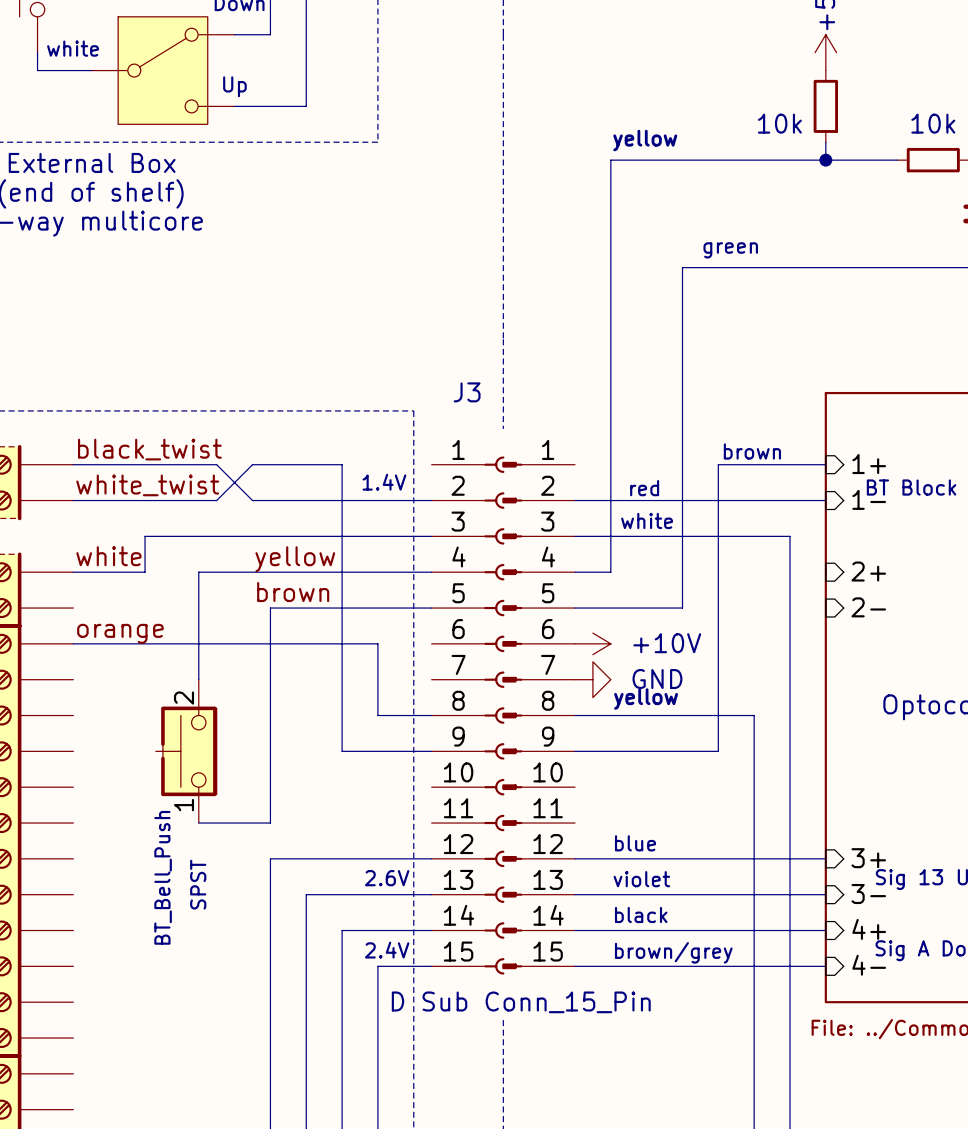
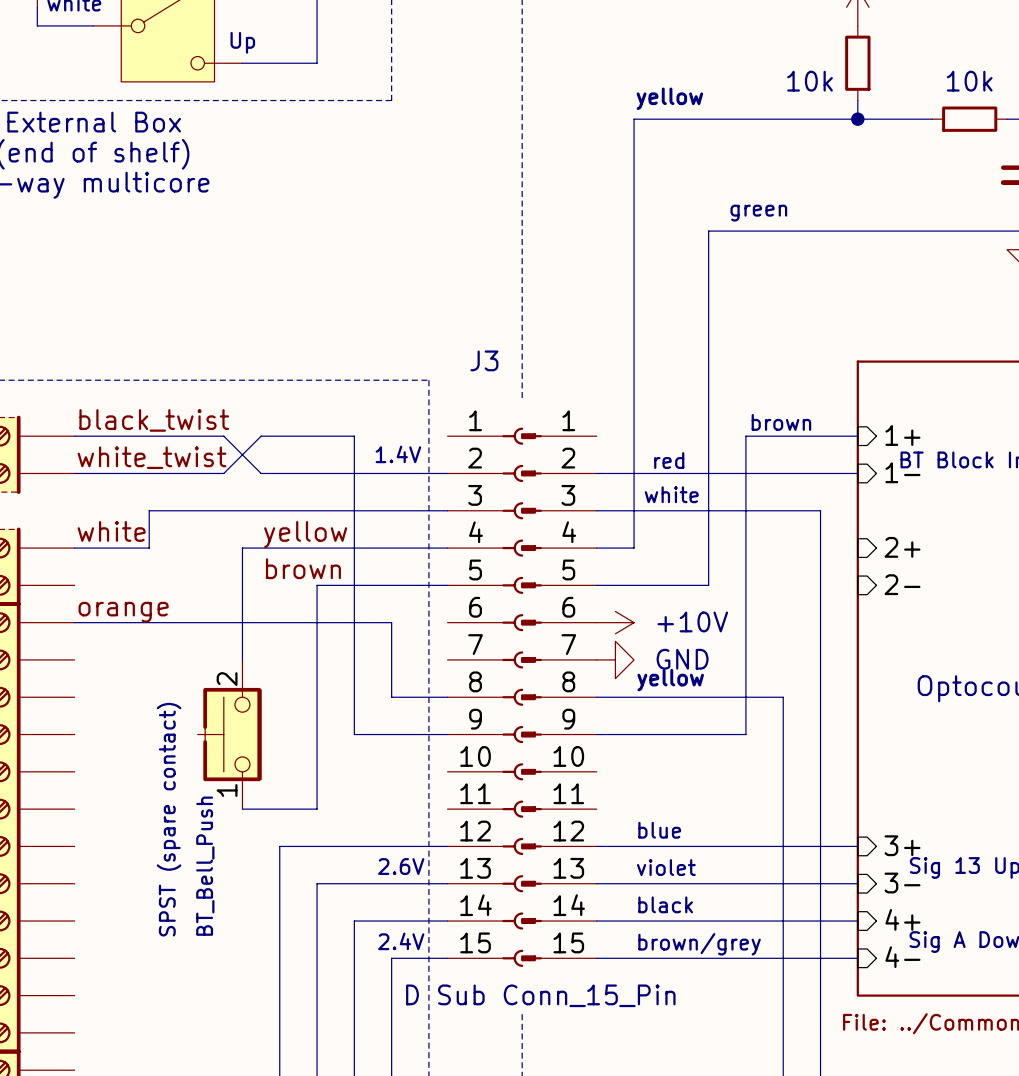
wire: (234, 572) (198, 572) (198, 679) -> (242, 548) (242, 659)
wire: (306, 608) (270, 608) (270, 823) -> (317, 585) (317, 809) (279, 809)
BT_Bell_Push: SPST (186, 751) -> none
BT_Bell_Push: none -> SPST (spare contact) (229, 734)
wire: (198, 823) (234, 823) -> none

